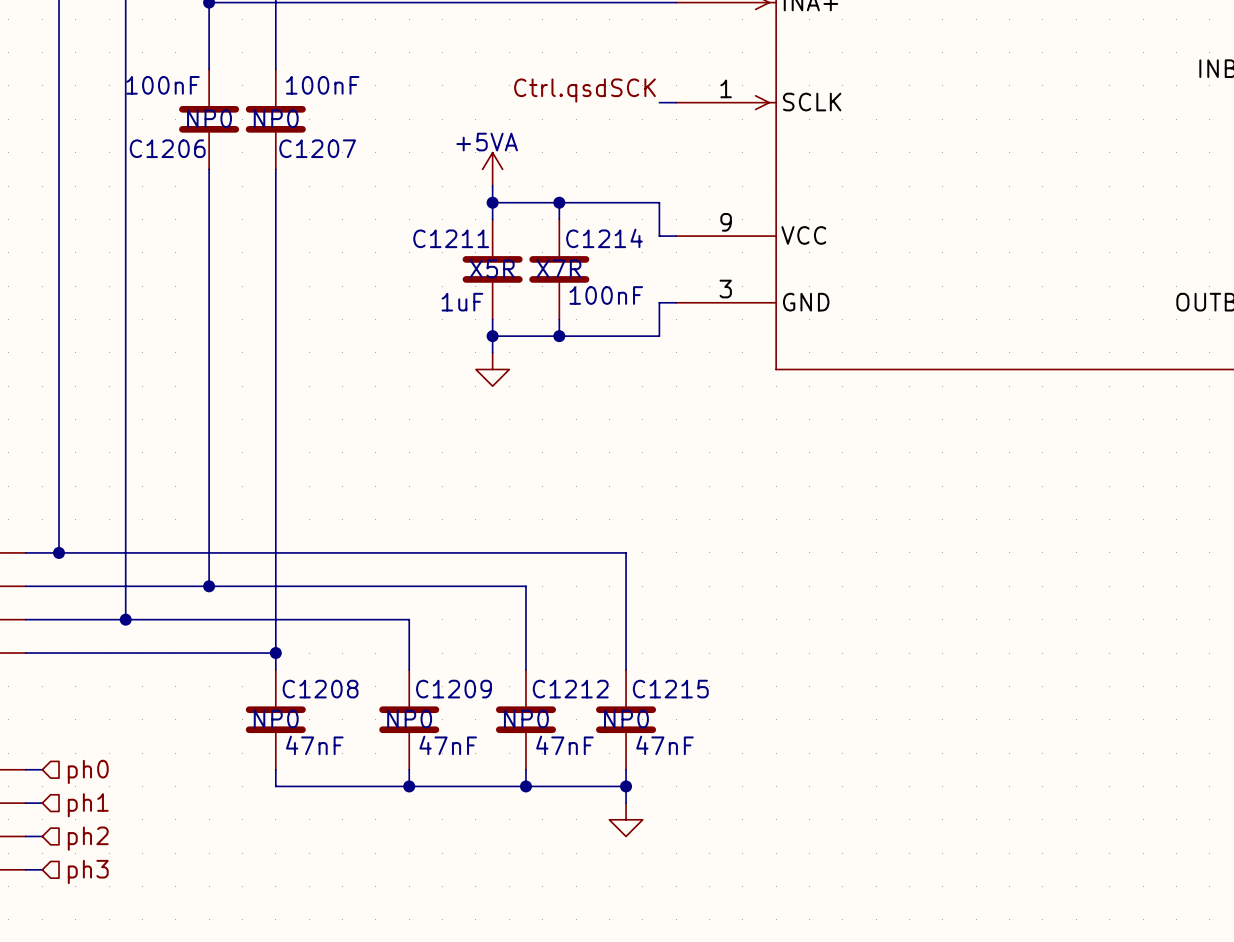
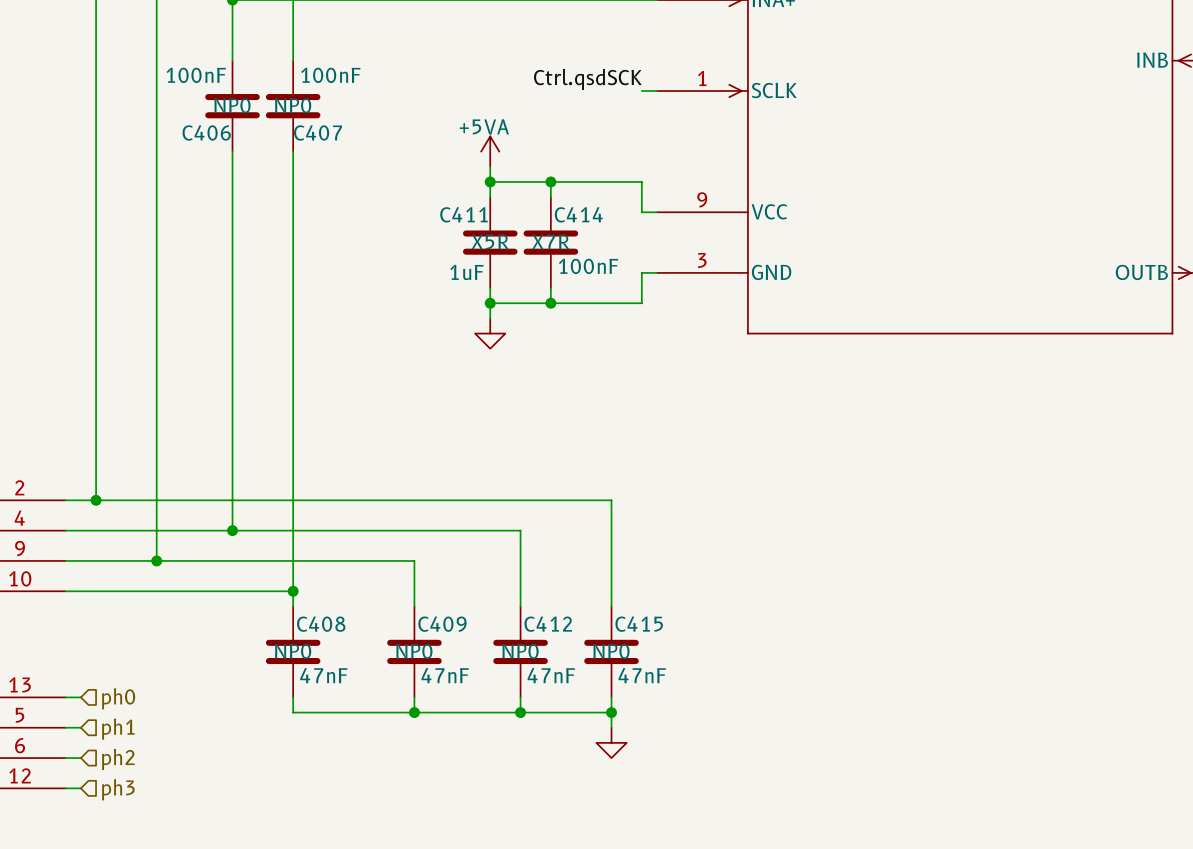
C1206 name: C1206 (167, 148) -> C406 (206, 132)
C1207 name: C1207 (317, 148) -> C407 (318, 132)
C1211 name: C1211 (451, 238) -> C411 (464, 214)
C1214 name: C1214 (604, 238) -> C414 (578, 214)
C1208 name: C1208 (320, 689) -> C408 (321, 624)
C1209 name: C1209 (453, 689) -> C409 (442, 624)
C1212 name: C1212 (570, 689) -> C412 (548, 624)
C1215 name: C1215 (670, 689) -> C415 (639, 624)

